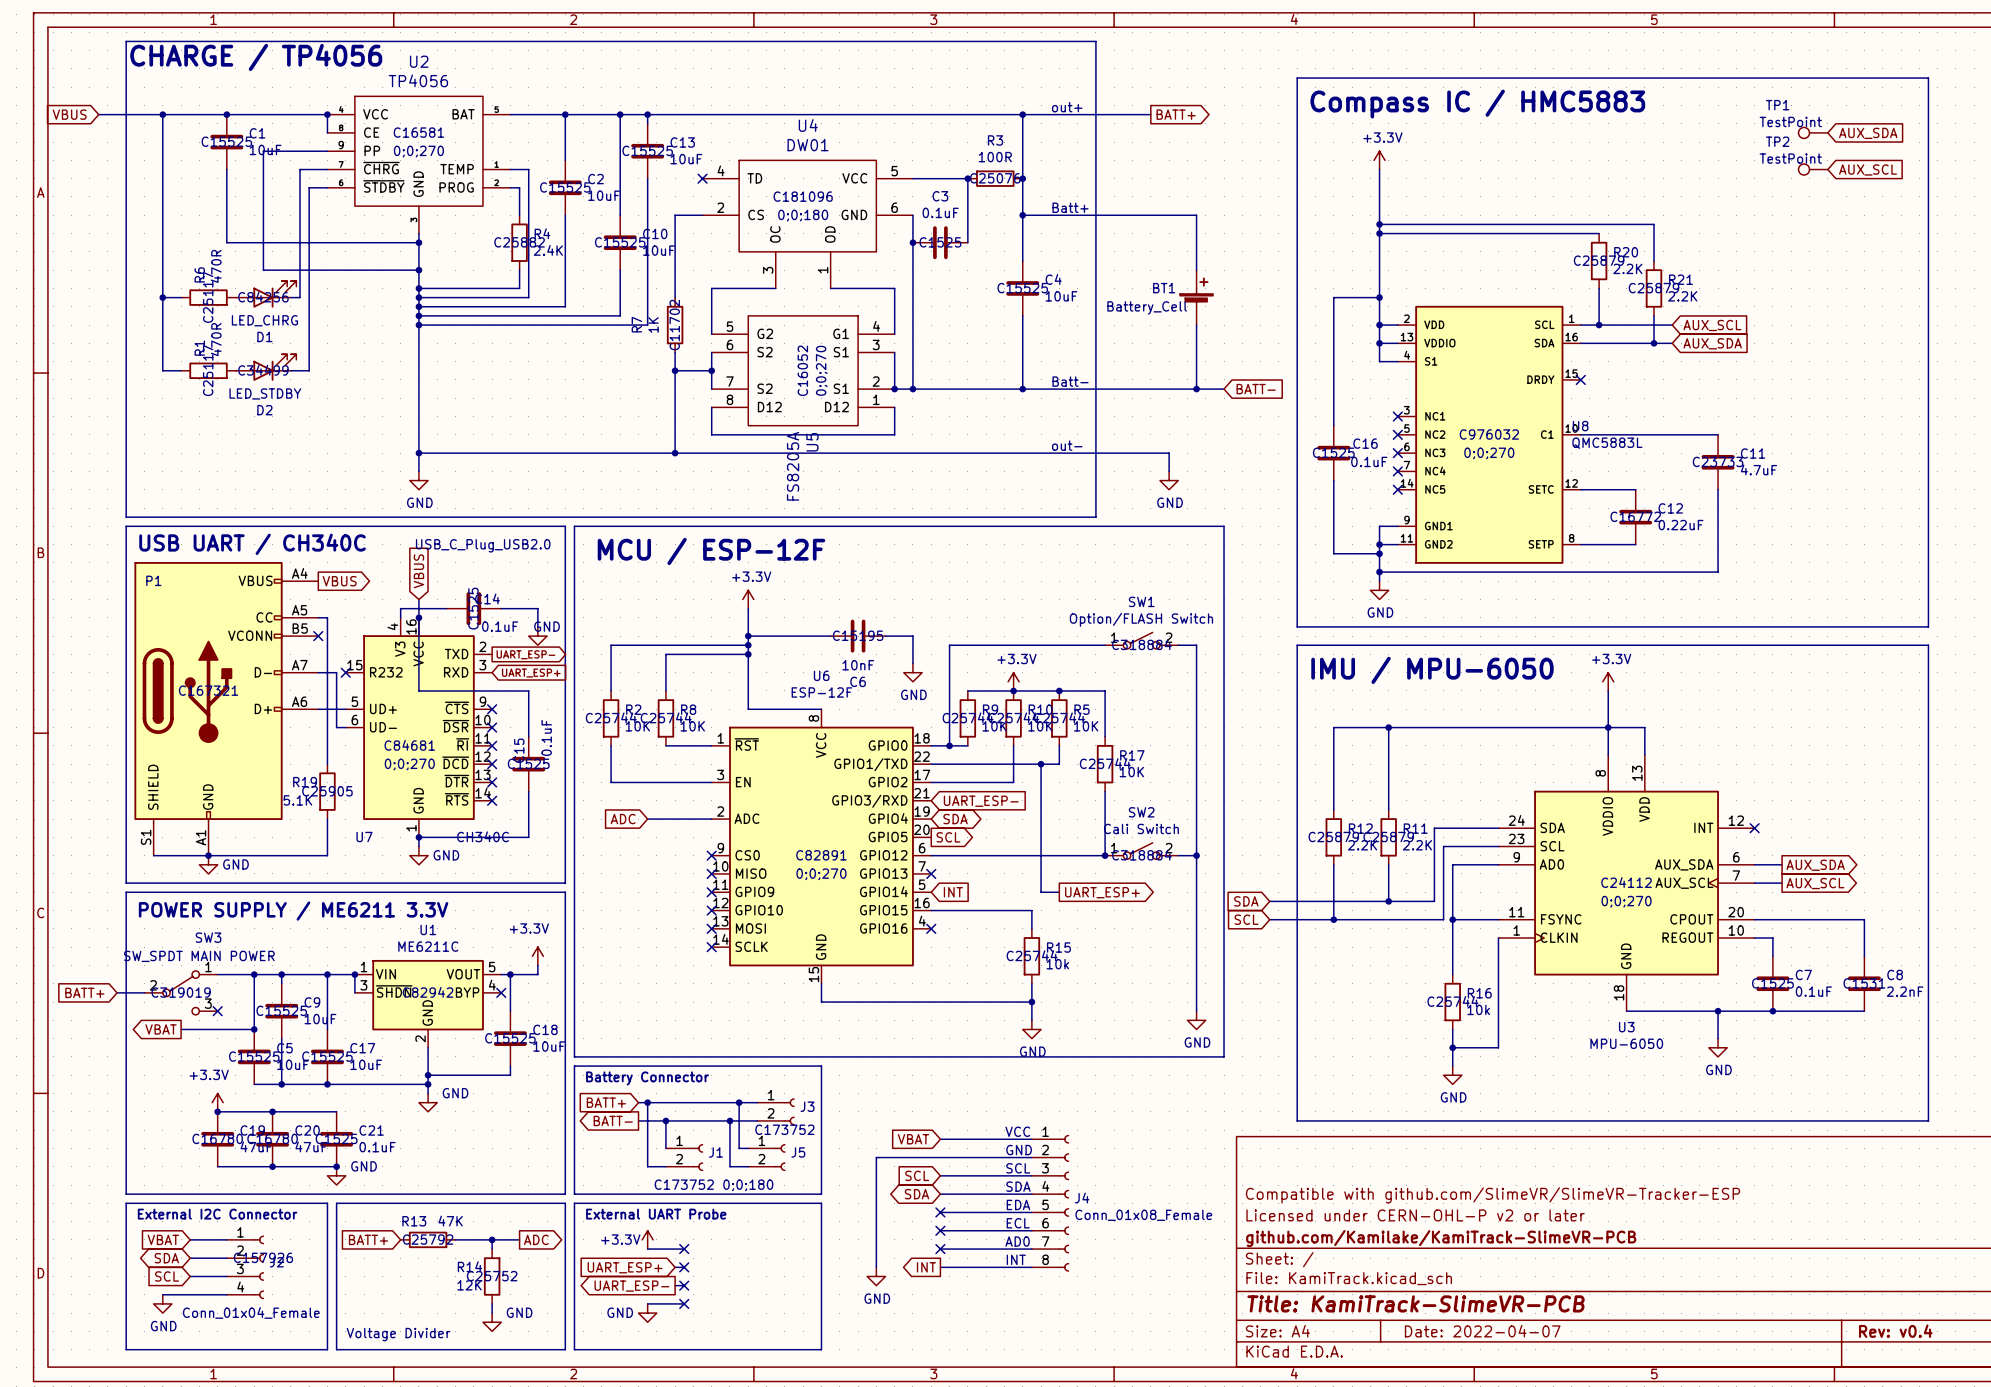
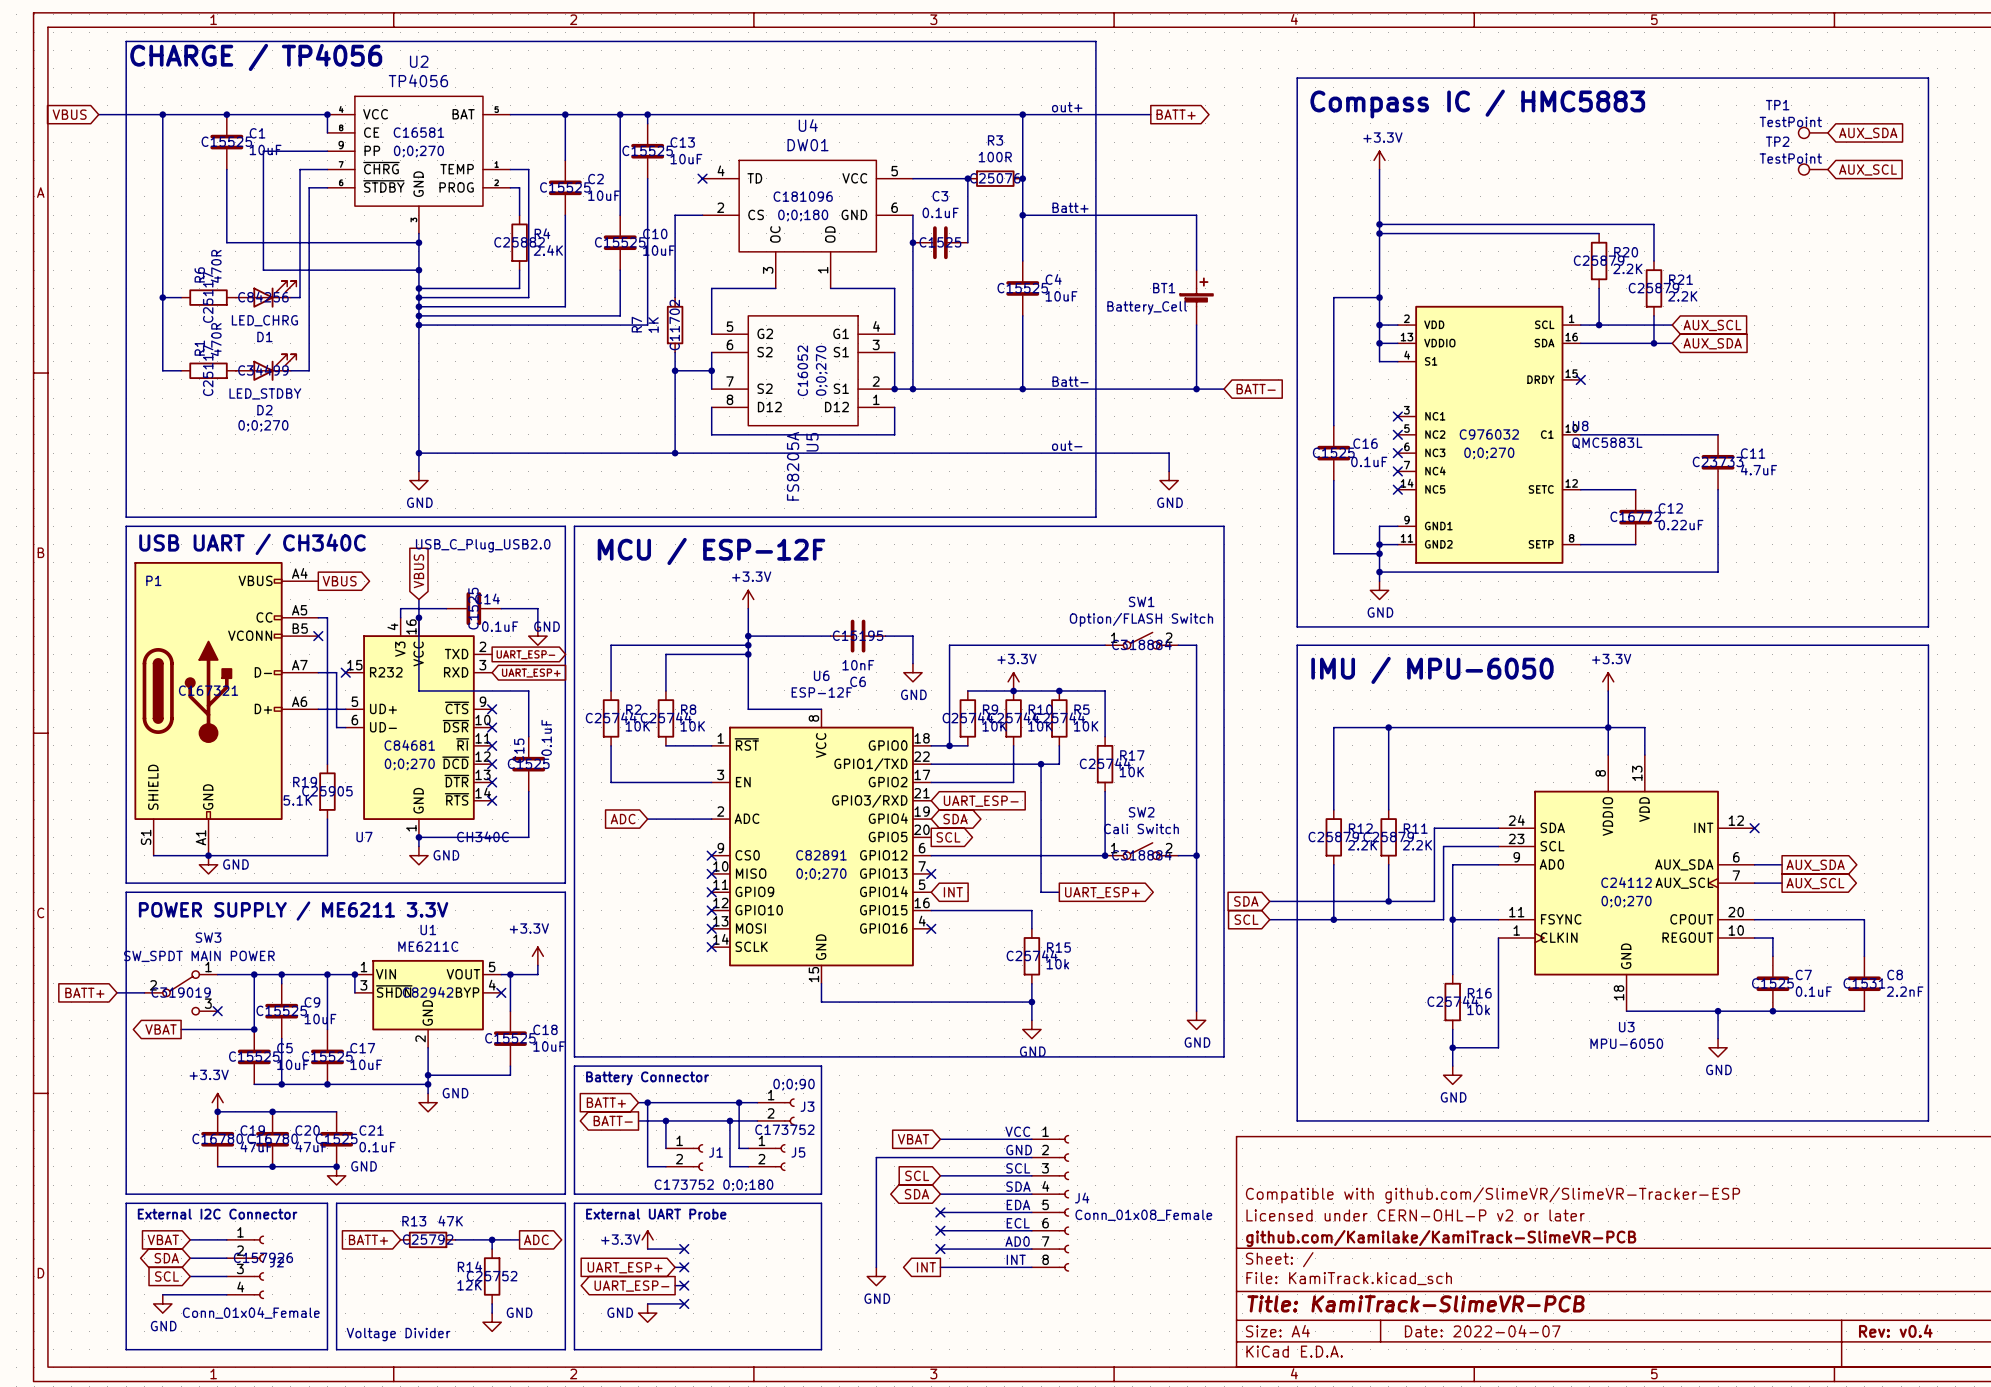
D2 text: none -> 0;0;270 (263, 425)
J3 text: none -> 0;0;90 (794, 1084)

